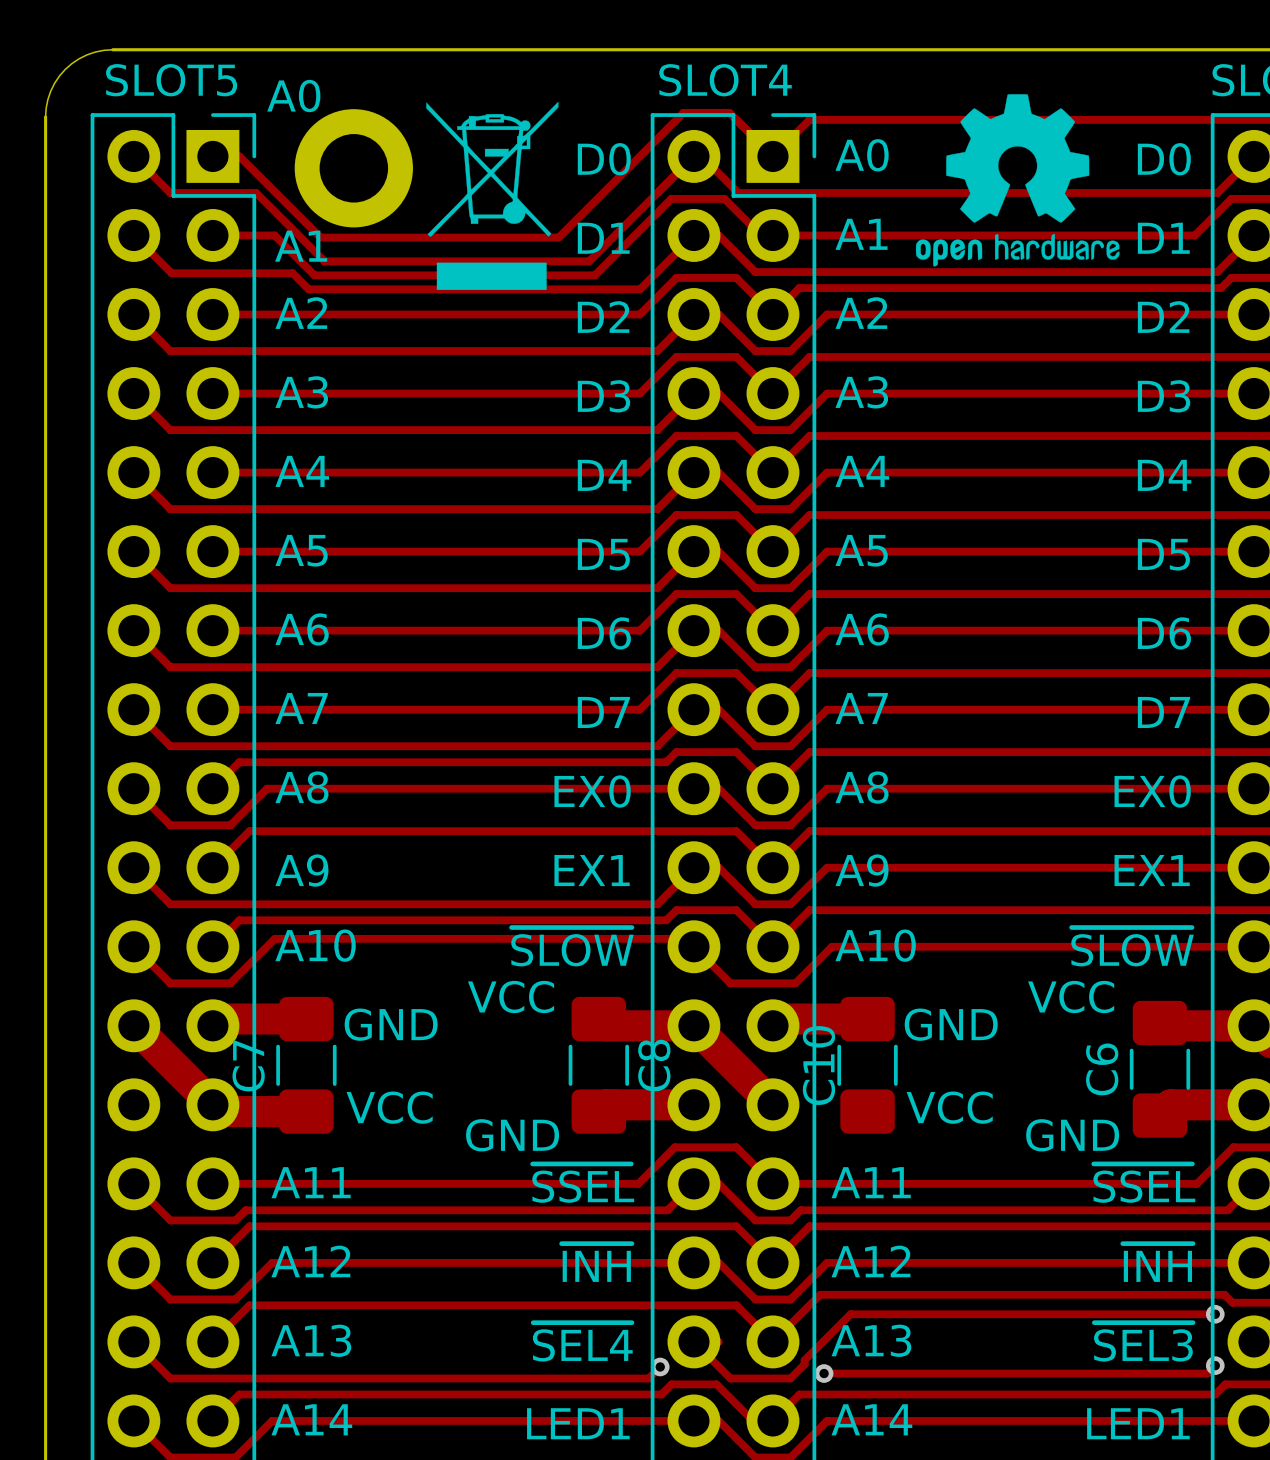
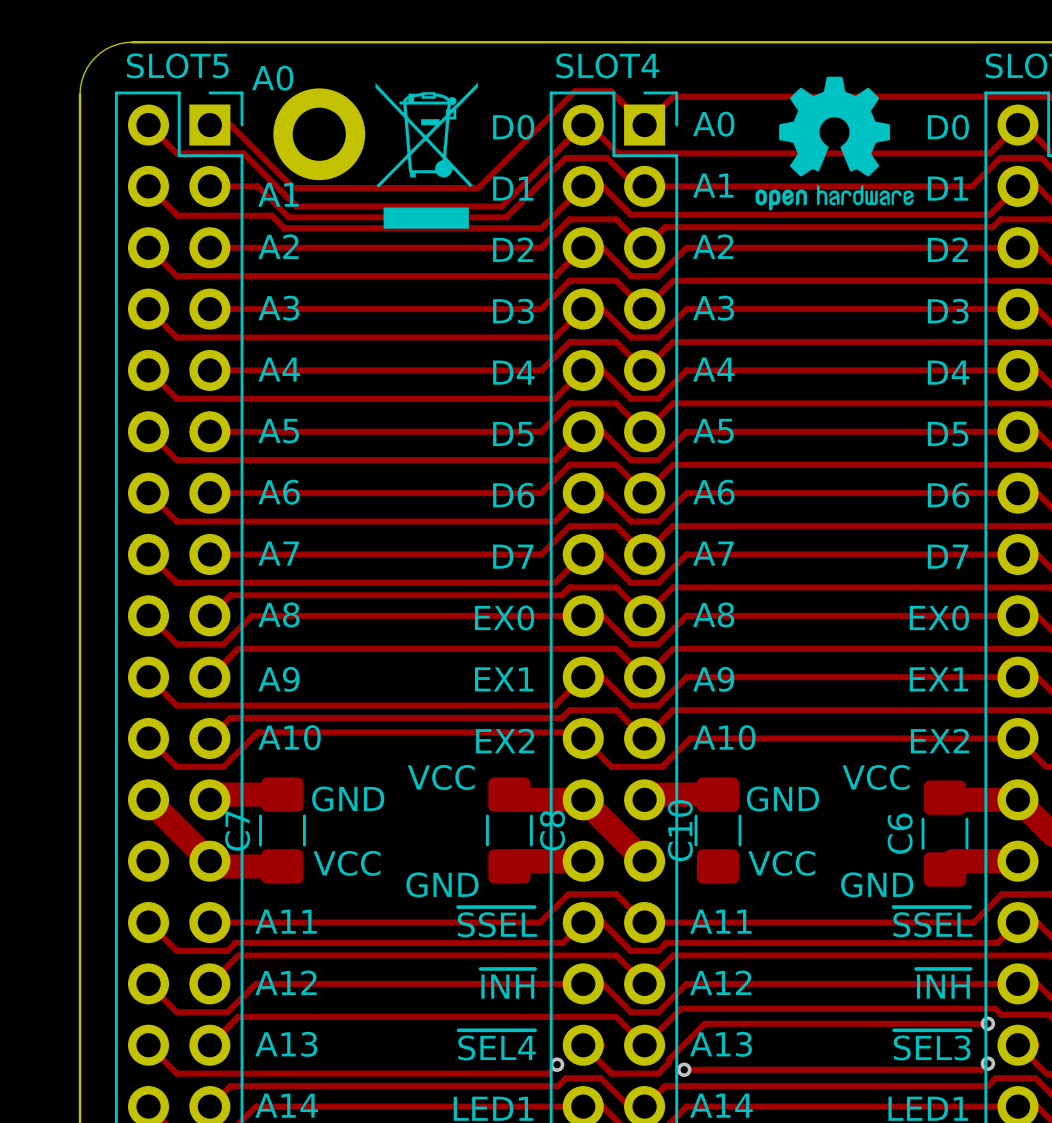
text: ~{SLOW} (572, 946) -> EX2 (505, 740)
text: ~{SLOW} (1132, 946) -> EX2 (939, 740)

